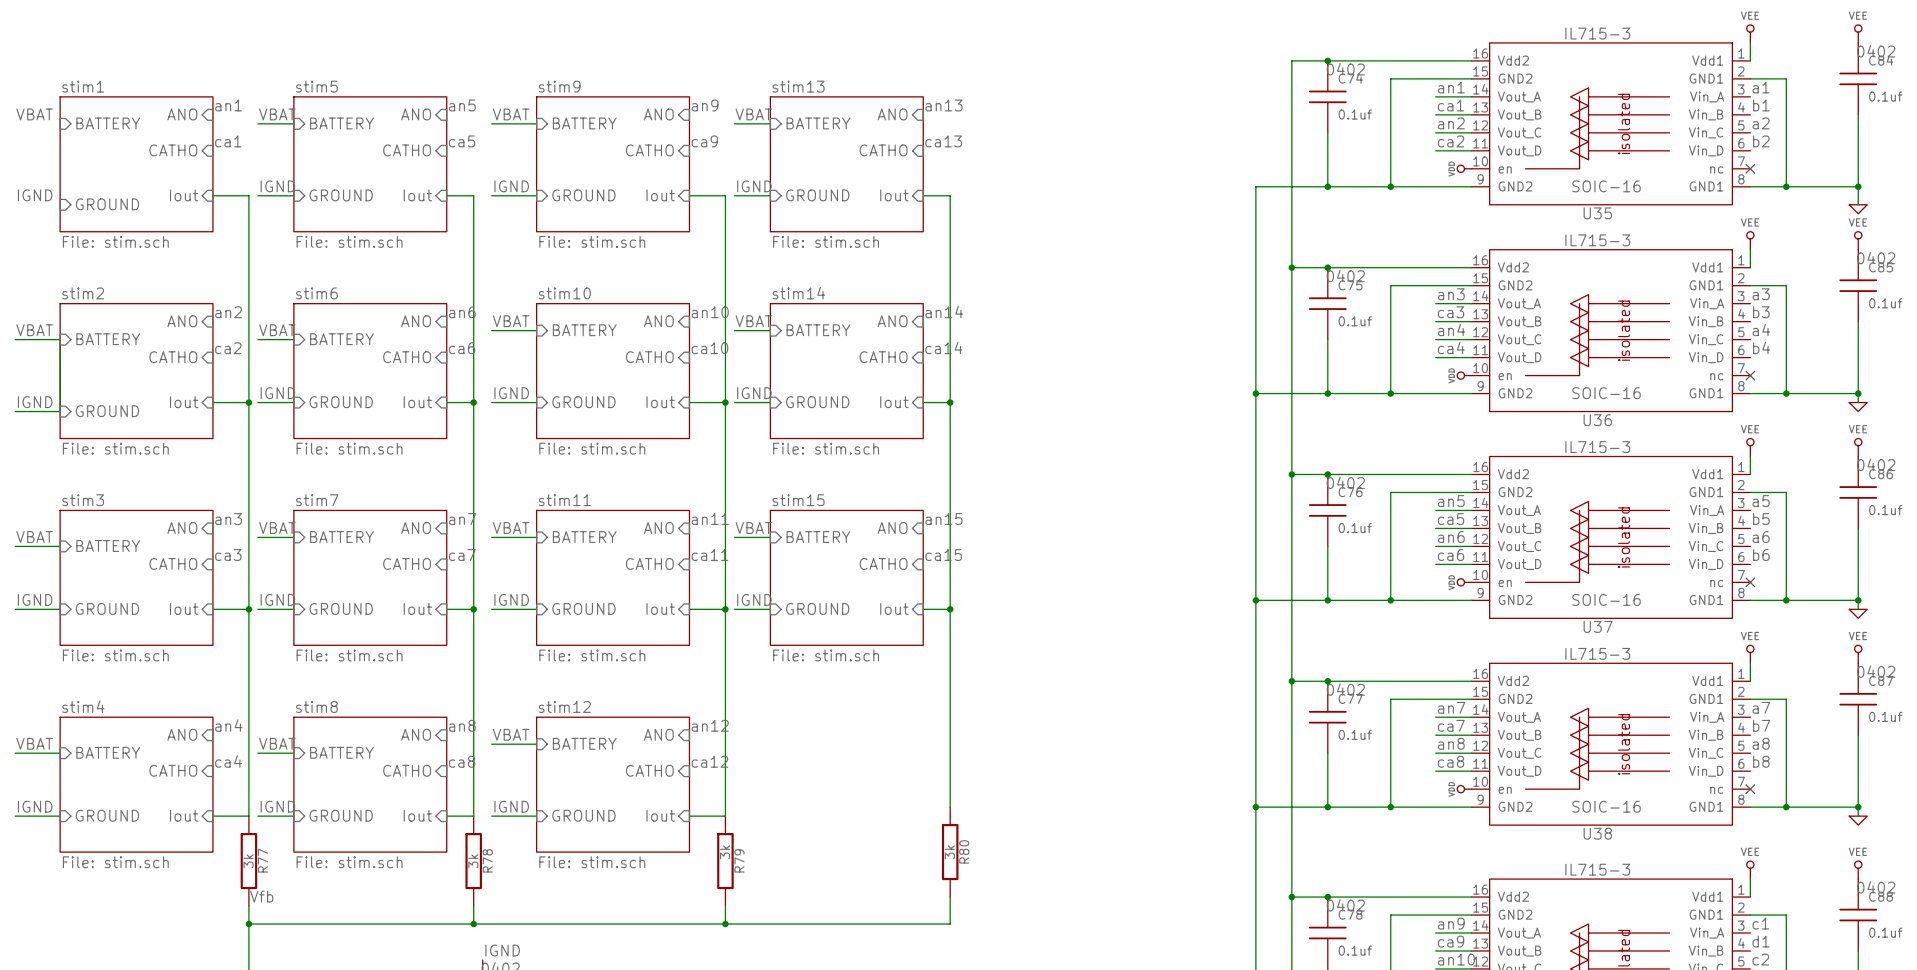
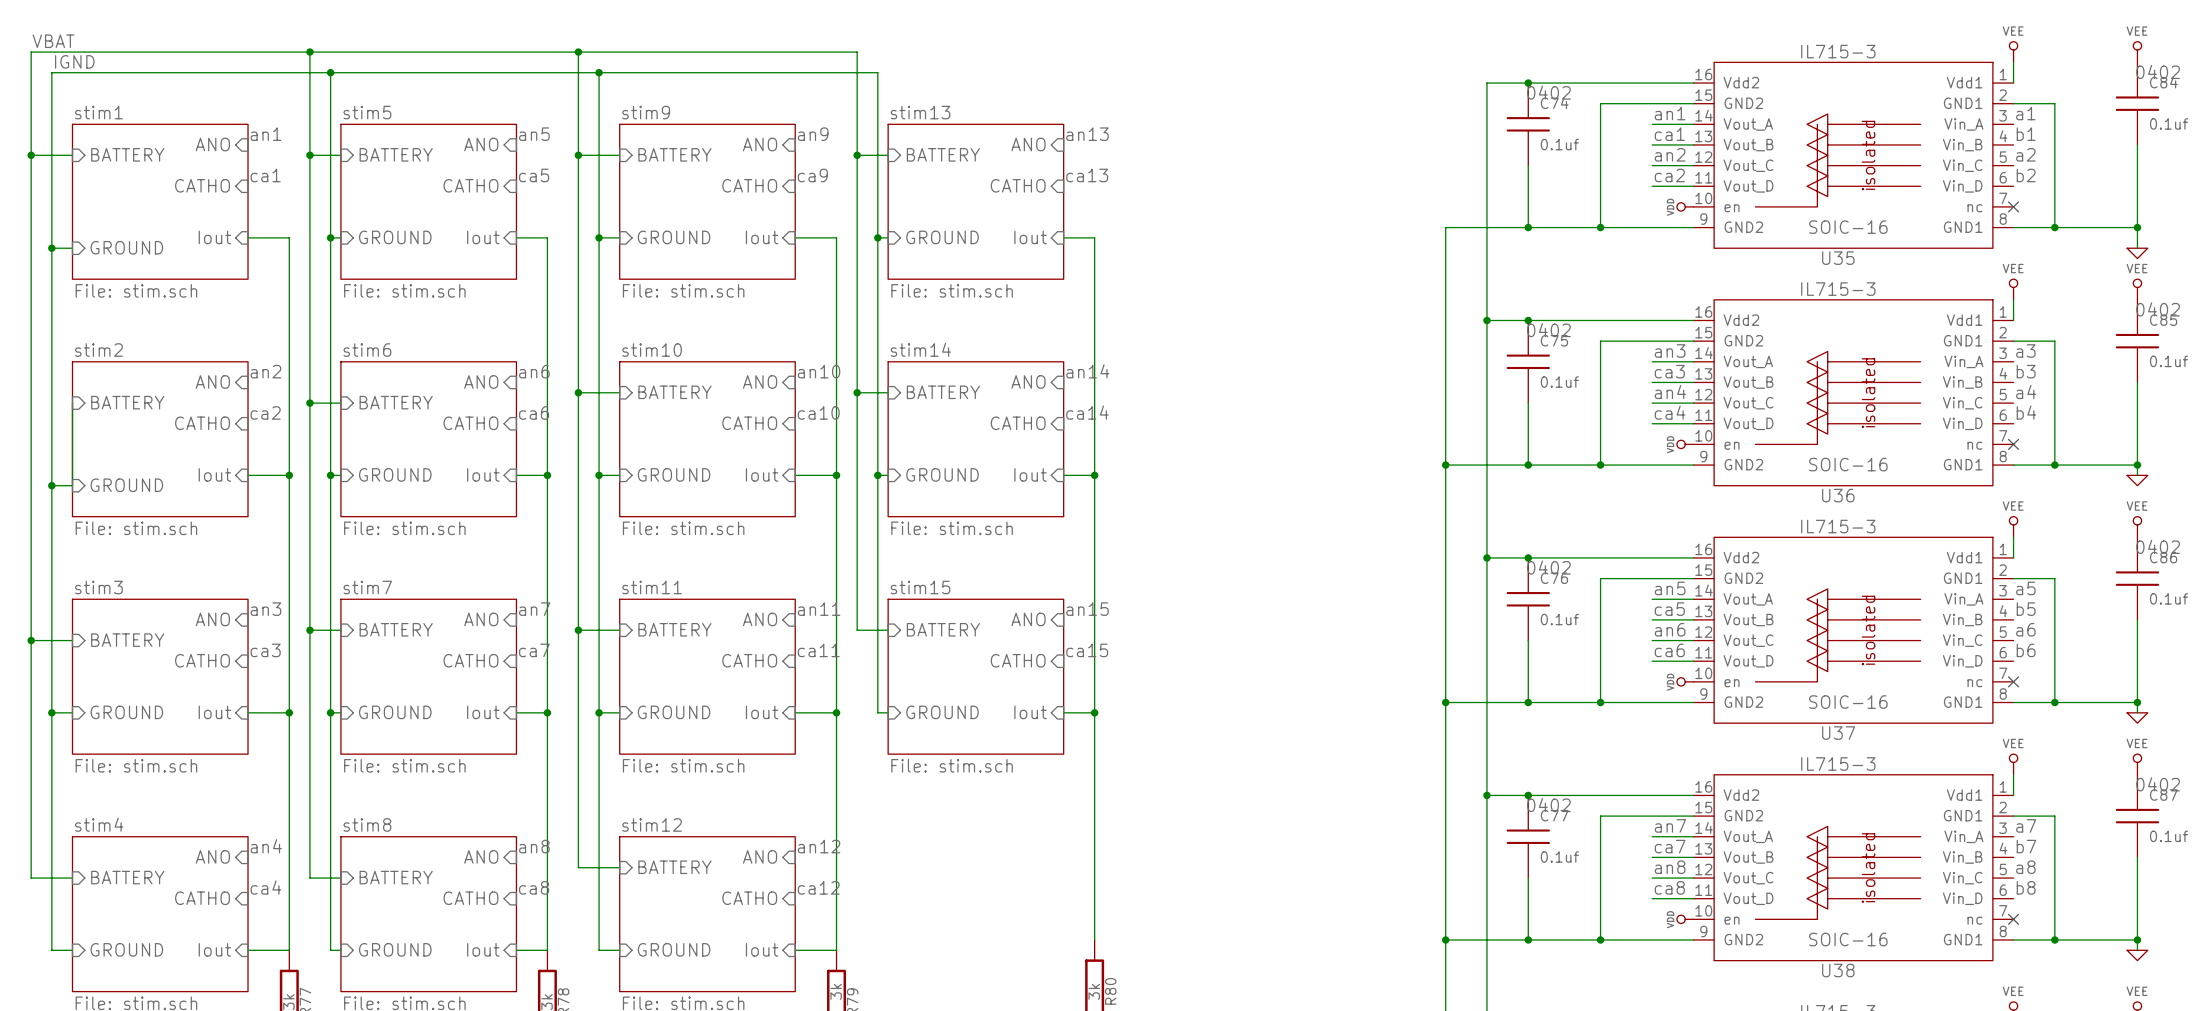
junction: none -> (309, 52)
junction: none -> (578, 52)
label: none -> IGND (74, 61)
junction: none -> (330, 72)
junction: none -> (599, 72)
label position: VBAT (34, 114) -> VBAT (53, 41)
label: VBAT (277, 114) -> none
label: VBAT (511, 114) -> none
label: VBAT (753, 114) -> none
wire: none -> (31, 155) (72, 155)
junction: none -> (31, 155)
wire: (257, 123) (266, 123) -> none
junction: none -> (309, 155)
wire: (491, 123) (500, 123) -> none
junction: none -> (578, 155)
wire: (734, 123) (743, 123) -> none
junction: none -> (857, 155)
label: IGND (277, 186) -> none
label: IGND (511, 186) -> none
label: IGND (754, 186) -> none
label: IGND (35, 195) -> none
wire: (257, 195) (284, 195) -> none
junction: none -> (330, 237)
wire: (491, 195) (518, 195) -> none
junction: none -> (599, 237)
wire: (734, 195) (761, 195) -> none
junction: none -> (877, 237)
wire: none -> (51, 248) (72, 248)
junction: none -> (51, 248)
label: VBAT (511, 321) -> none
label: VBAT (753, 321) -> none
label: VBAT (34, 330) -> none
label: VBAT (277, 330) -> none
wire: (491, 330) (500, 330) -> none
junction: none -> (578, 392)
wire: (734, 330) (743, 330) -> none
junction: none -> (857, 392)
wire: (15, 339) (60, 339) -> none
wire: (257, 339) (266, 339) -> none
junction: none -> (309, 403)
label: IGND (277, 393) -> none
label: IGND (511, 393) -> none
label: IGND (754, 393) -> none
label: IGND (35, 402) -> none
wire: (257, 402) (284, 402) -> none
junction: none -> (330, 475)
wire: (491, 402) (518, 402) -> none
junction: none -> (599, 475)
wire: (734, 402) (761, 402) -> none
junction: none -> (877, 475)
wire: (15, 411) (42, 411) -> none
junction: none -> (51, 485)
label: VBAT (277, 528) -> none
label: VBAT (511, 528) -> none
label: VBAT (753, 528) -> none
label: VBAT (34, 537) -> none
wire: (257, 537) (266, 537) -> none
junction: none -> (309, 630)
wire: (491, 537) (500, 537) -> none
junction: none -> (578, 630)
wire: (734, 537) (743, 537) -> (31, 878) (31, 52) (857, 52) (857, 630)
wire: (15, 546) (24, 546) -> none
junction: none -> (31, 640)
label: IGND (35, 599) -> none
label: IGND (277, 599) -> none
label: IGND (511, 599) -> none
label: IGND (754, 599) -> none
wire: (15, 609) (42, 609) -> none
junction: none -> (51, 712)
wire: (257, 609) (284, 609) -> none
junction: none -> (330, 712)
wire: (491, 609) (518, 609) -> none
junction: none -> (599, 712)
wire: (734, 609) (761, 609) -> (51, 950) (51, 72) (877, 72) (877, 712)
label: VBAT (511, 734) -> none
label: VBAT (34, 743) -> none
label: VBAT (277, 743) -> none
wire: (491, 744) (500, 744) -> (578, 52) (578, 867)
wire: (15, 753) (24, 753) -> none
wire: (257, 753) (266, 753) -> (309, 52) (309, 878)
label: IGND (35, 806) -> none
label: IGND (277, 806) -> none
label: IGND (511, 806) -> none
wire: (15, 816) (42, 816) -> none
wire: (257, 816) (284, 816) -> (330, 72) (330, 950)
wire: (491, 816) (518, 816) -> (599, 72) (599, 950)

